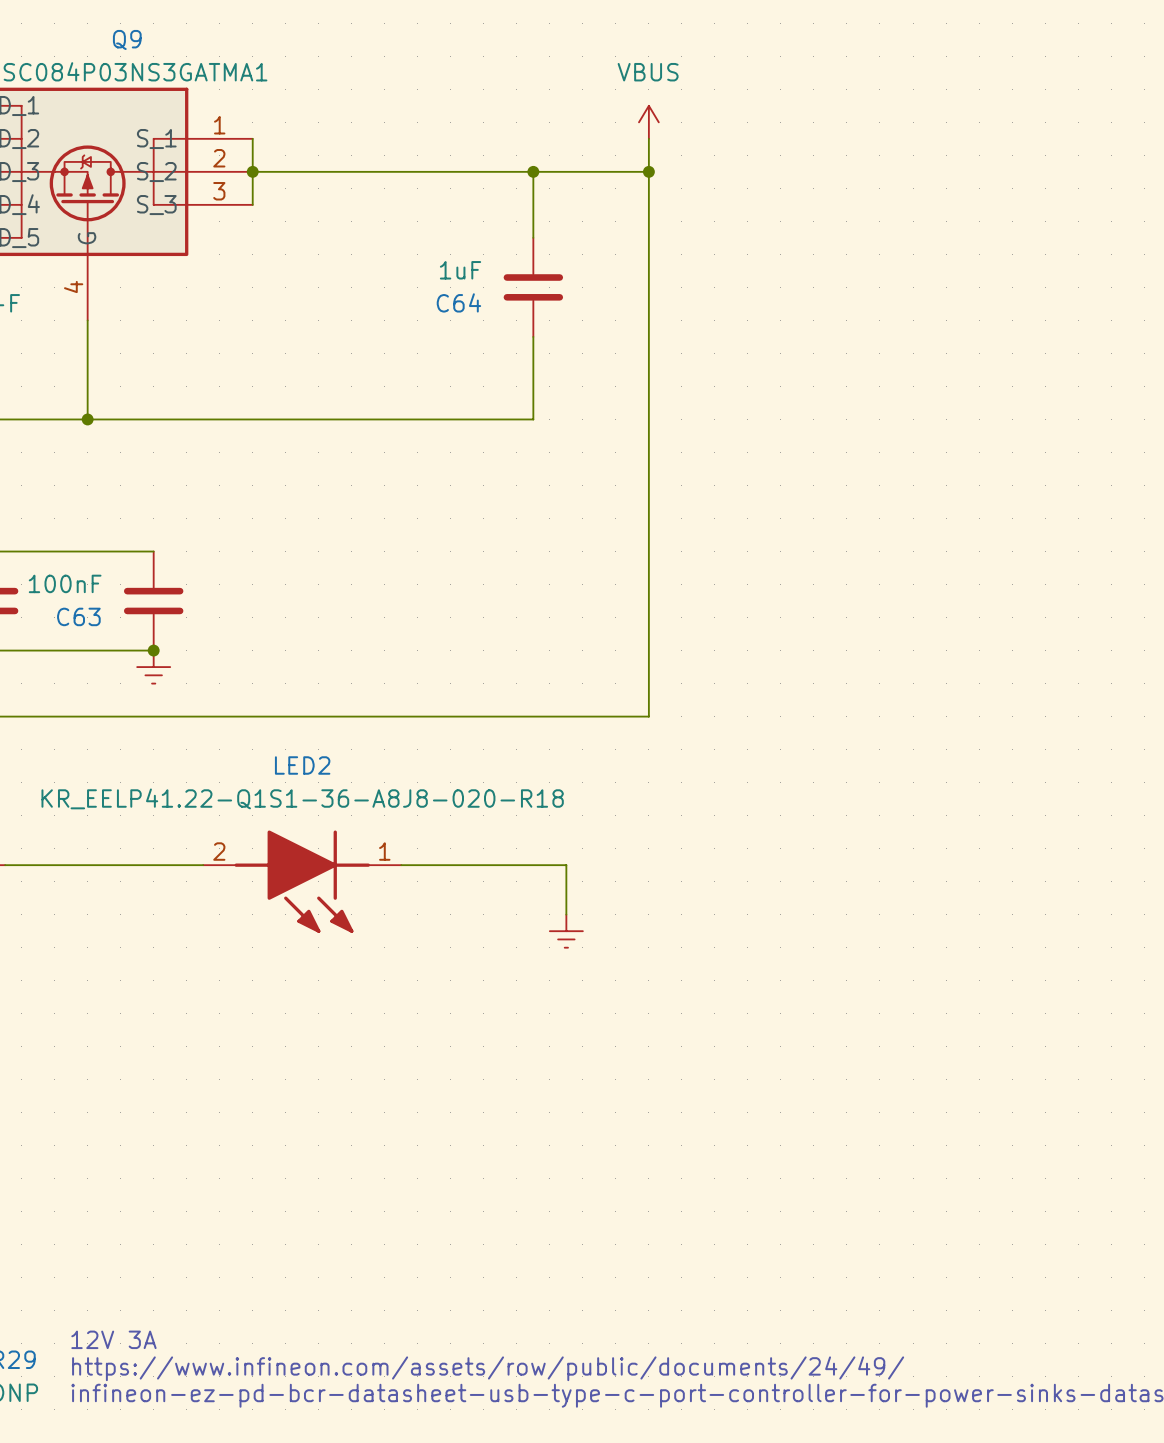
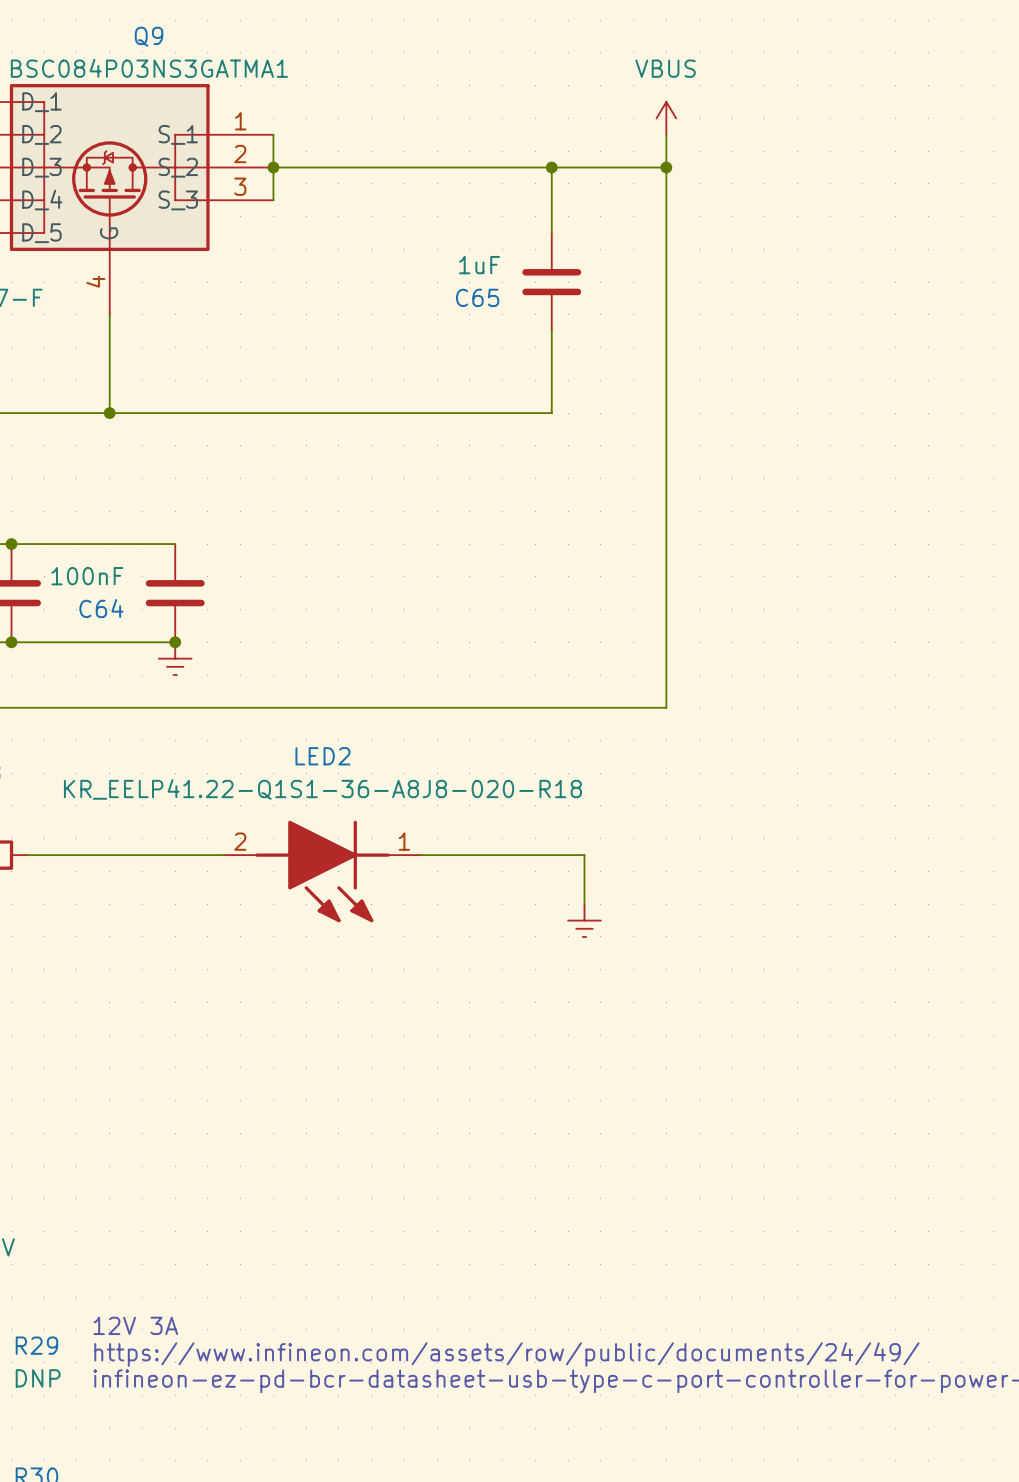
C64 name: C64 (458, 302) -> C65 (477, 297)
C63 name: C63 (78, 616) -> C64 (101, 608)

